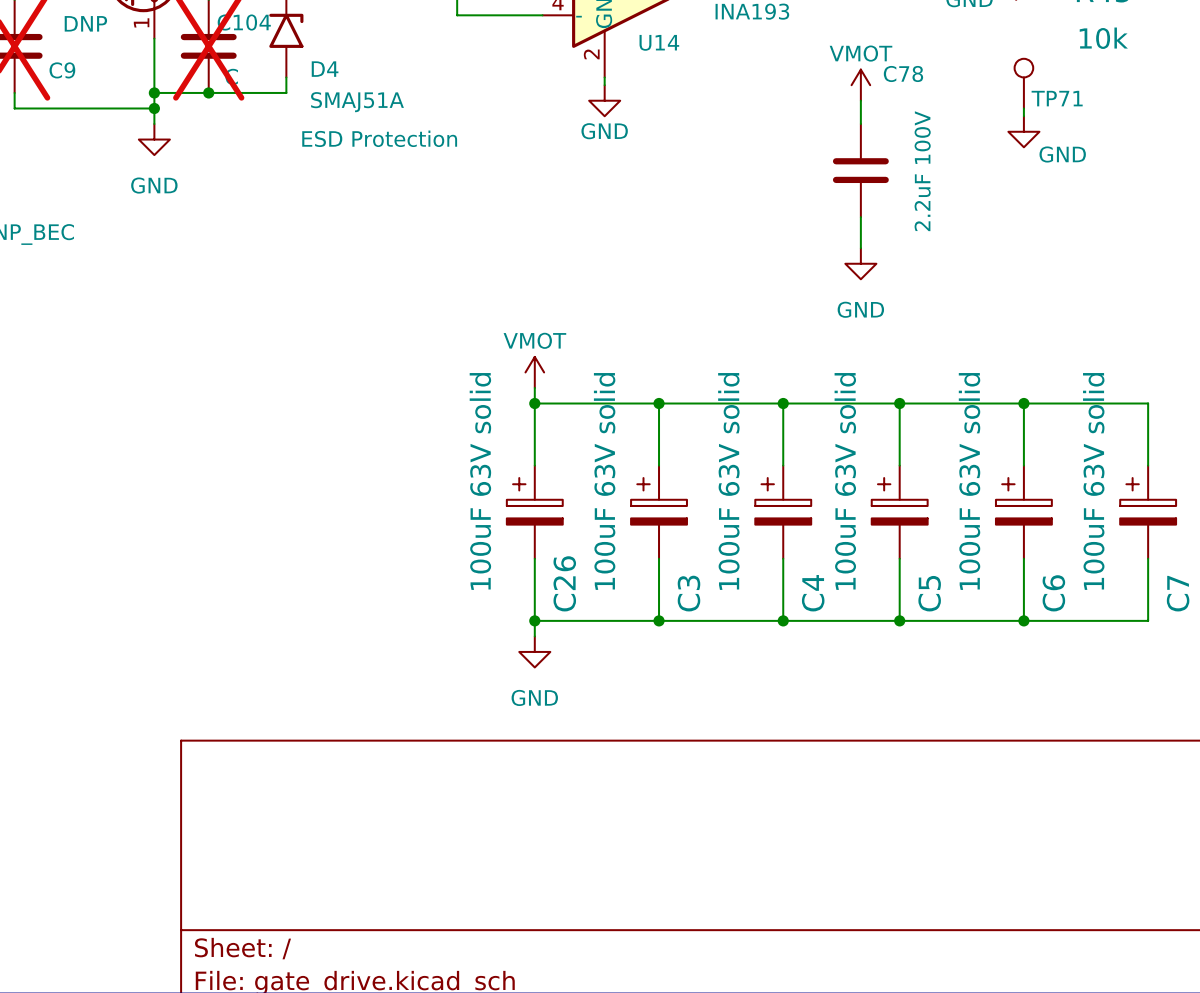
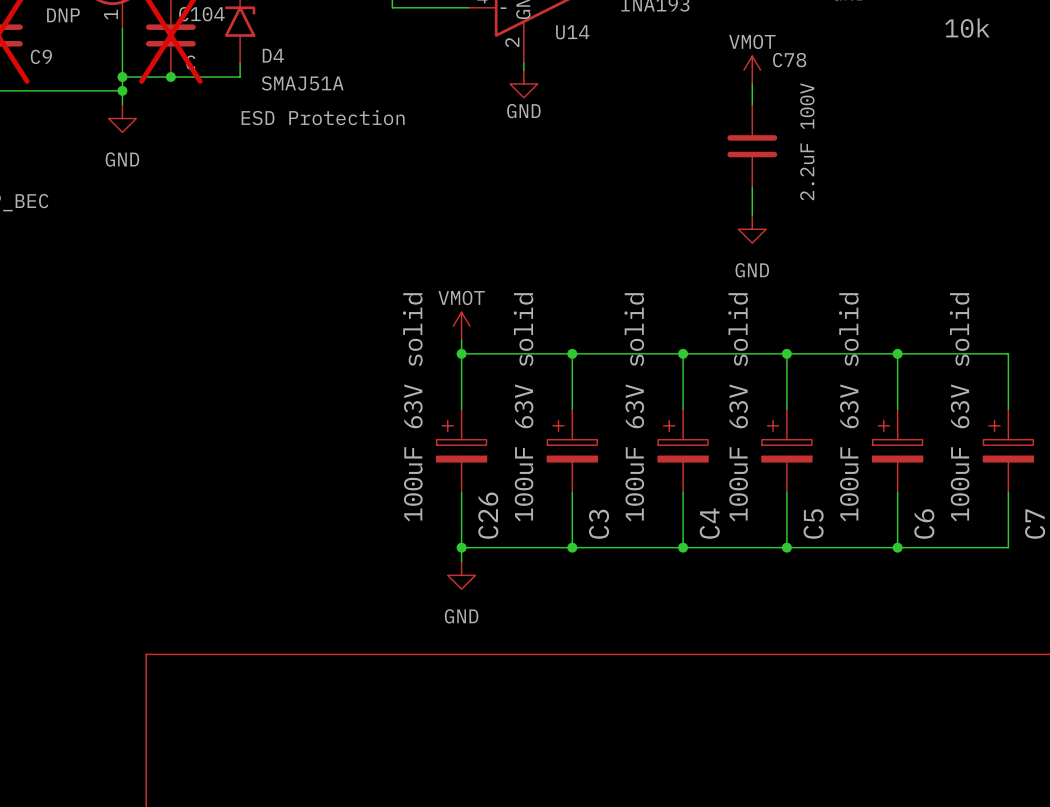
TP71: (1023, 83) -> none
wire: (1023, 108) (1023, 116) -> none
power symbol: GND (1023, 131) -> none

